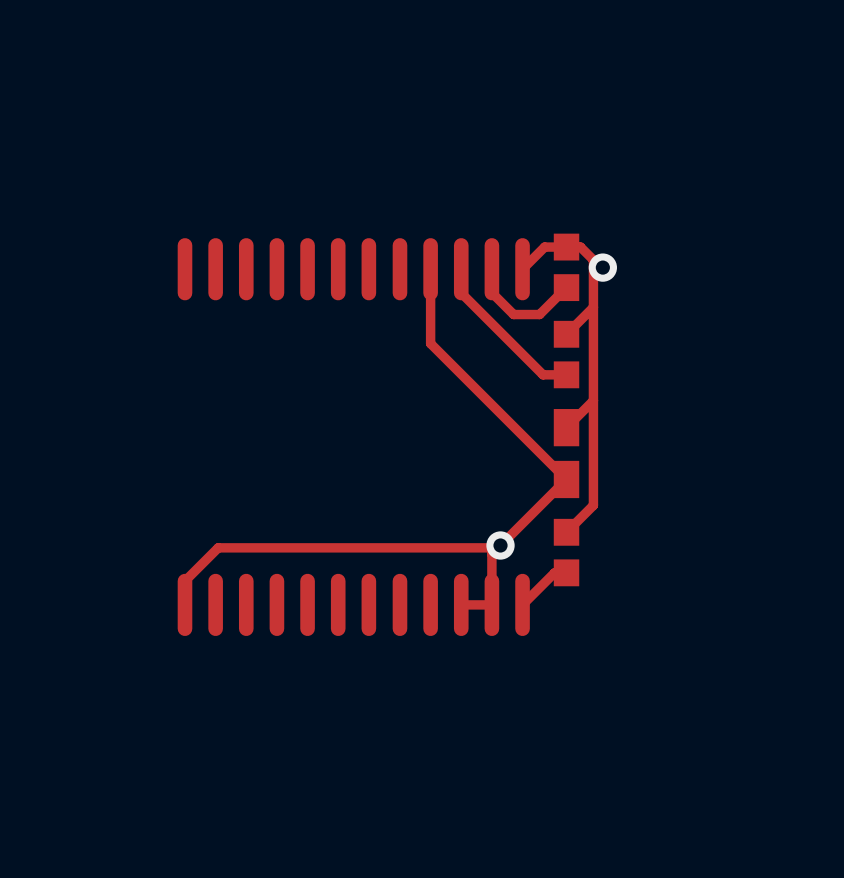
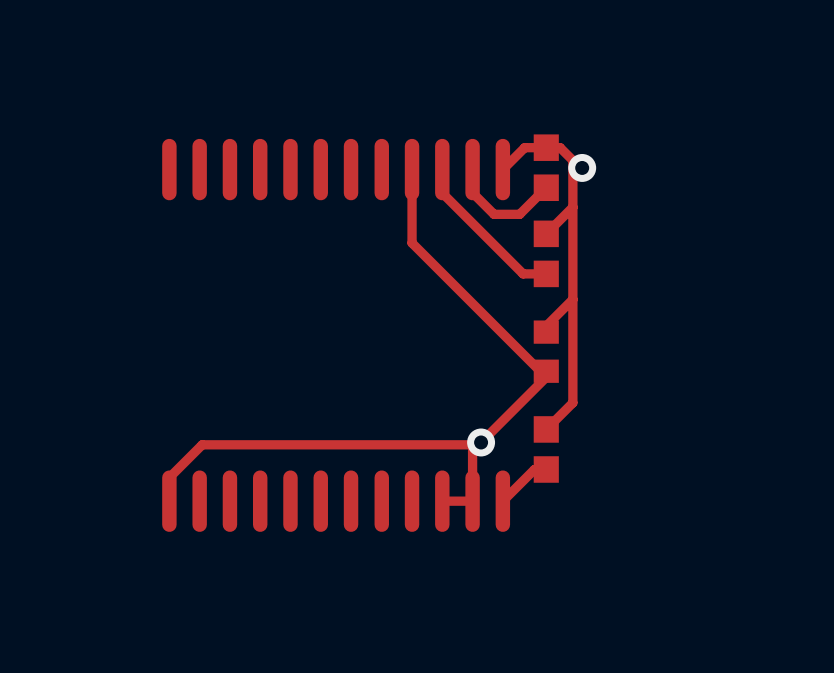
part footprint: [553, 409, 580, 499] -> [533, 320, 559, 383]

